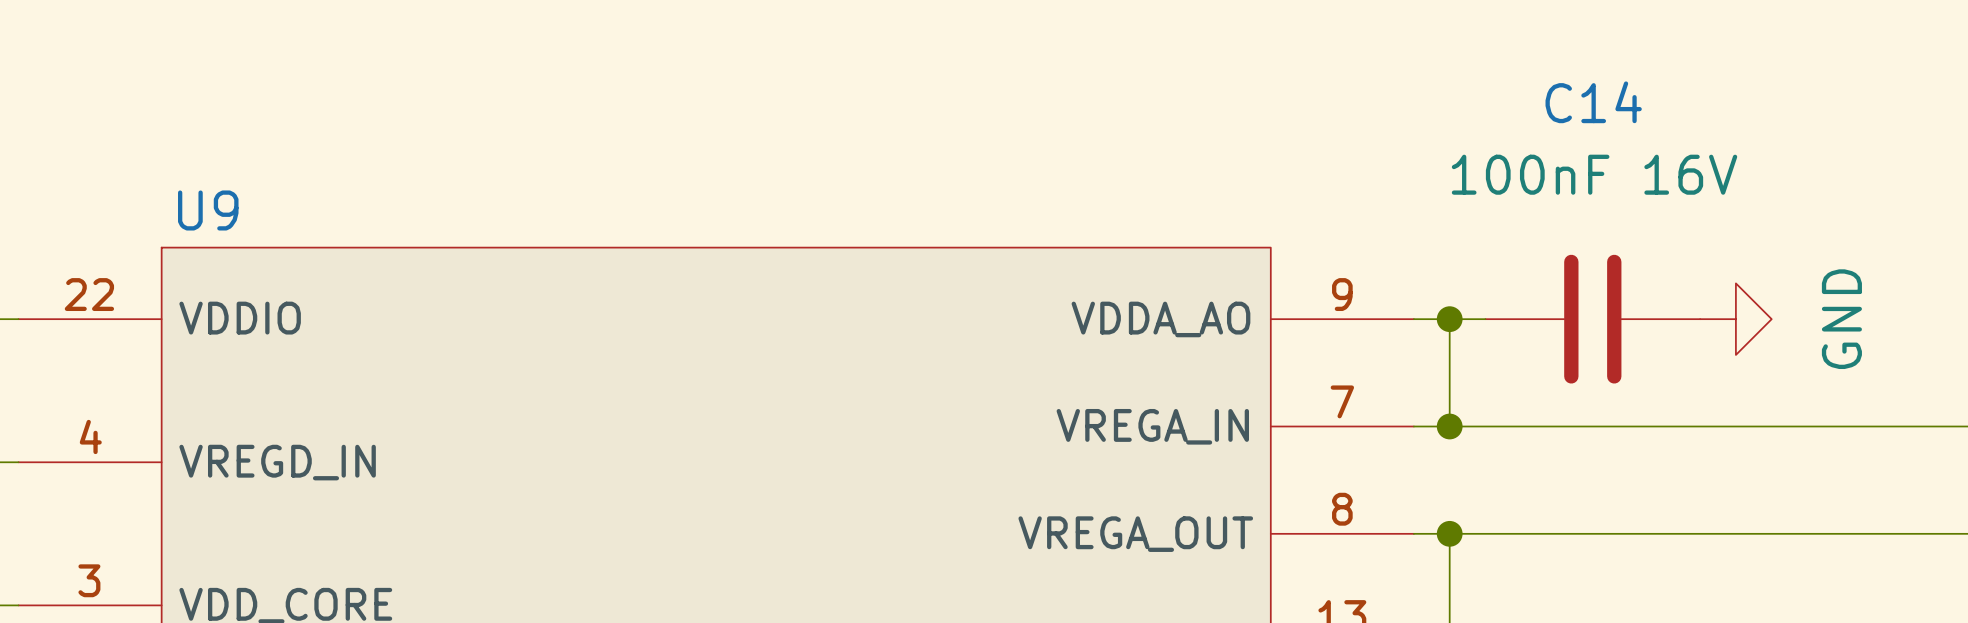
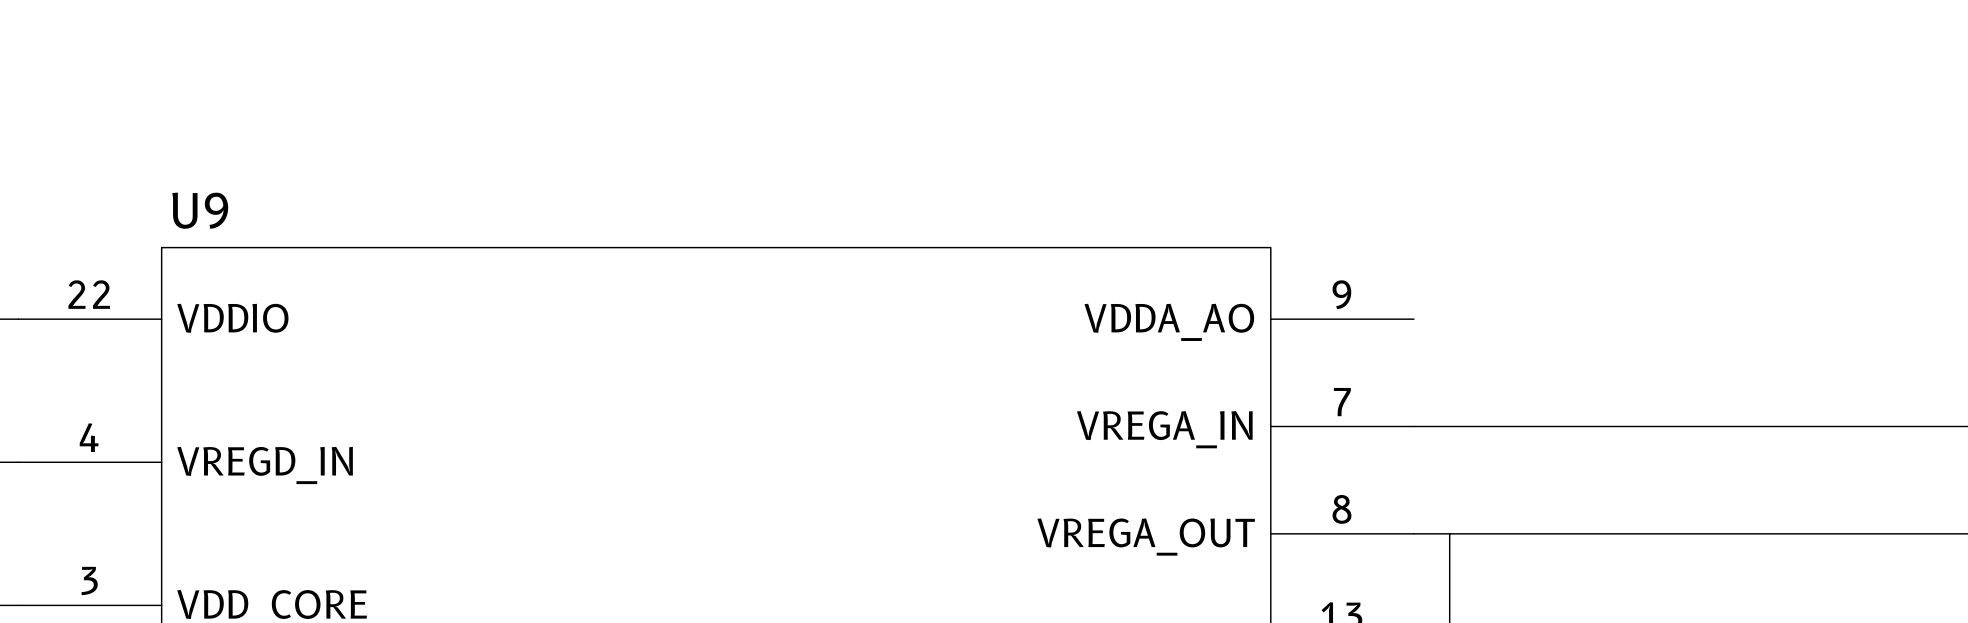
wire: (1413, 319) (1485, 319) -> none
wire: (1449, 319) (1449, 426) -> none
junction: (1449, 319) -> none
C14: 100nF 16V (1592, 319) -> none
power symbol: GND (1735, 319) -> none
junction: (1449, 426) -> none
junction: (1449, 533) -> none

